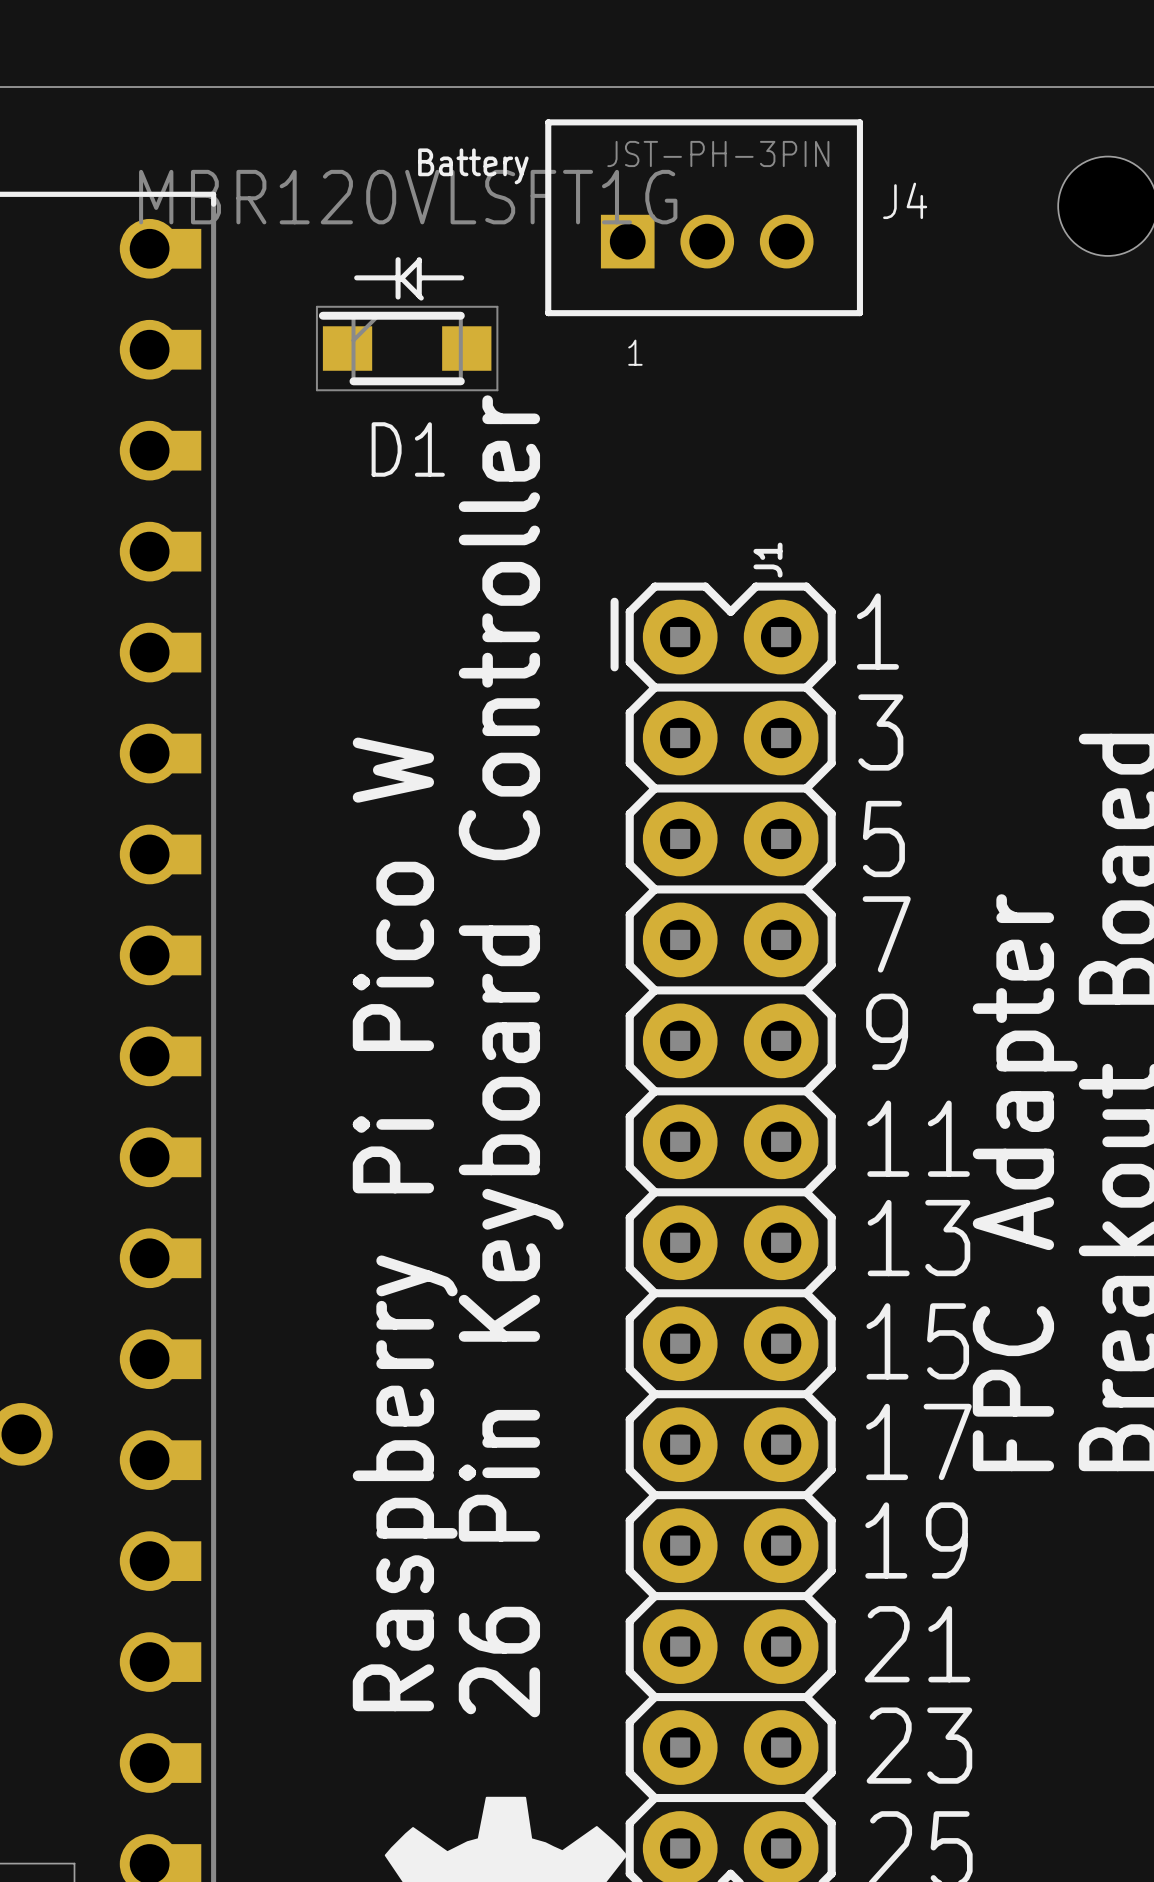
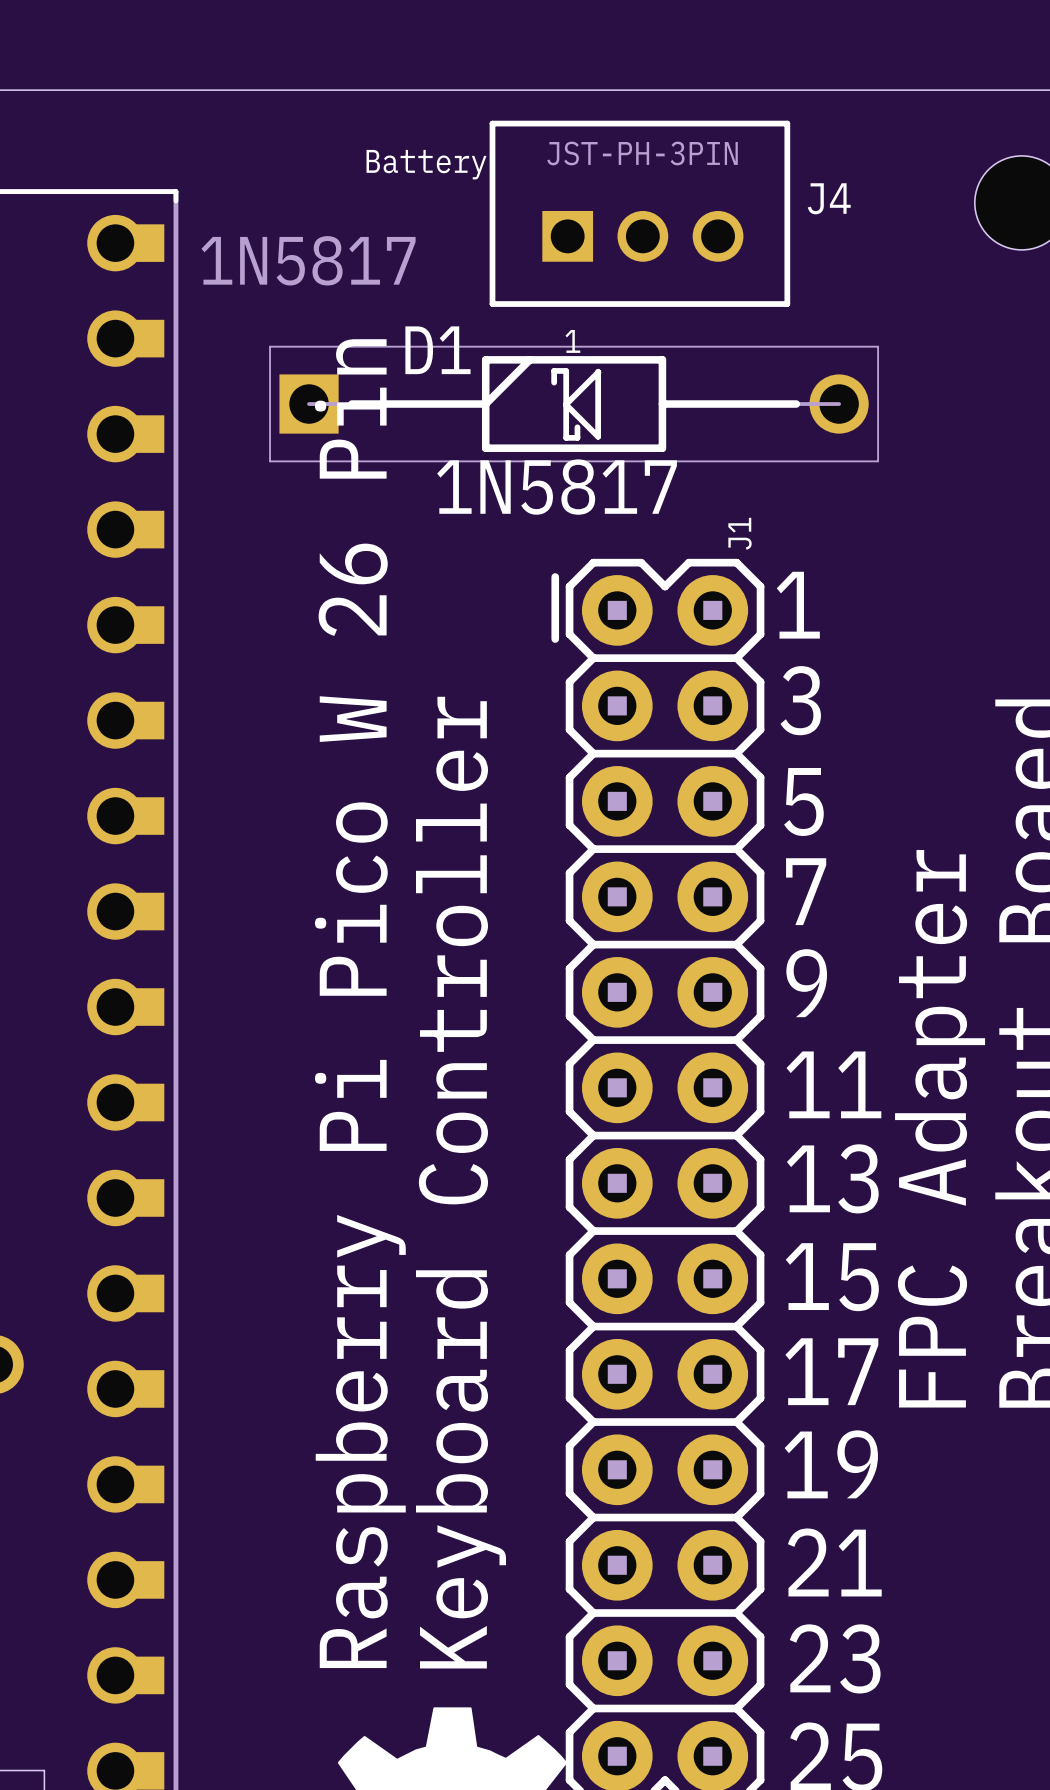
D1 value: MBR120VLSFT1G (408, 197) -> 1N5817 (308, 260)
D1 footprint: [315, 257, 499, 392] -> [269, 345, 880, 463]
line: none -> (565, 370) (554, 370) (554, 382)
line: none -> (566, 371) (566, 437) (577, 437) (577, 427)
line: none -> (598, 371) (598, 436) (566, 404)
line: none -> (598, 372) (566, 404)
D1 name position: D1 (408, 449) -> D1 (437, 350)
text: none -> 1N5817 (557, 487)
J1 name position: J1 (767, 560) -> J1 (740, 533)
text: 26 Pin Keyboard Controller (511, 1056) -> Keyboard Controller (461, 1182)
text: Raspberry Pi Pico W (405, 1224) -> Raspberry Pi Pico W 26 Pin (360, 1003)

